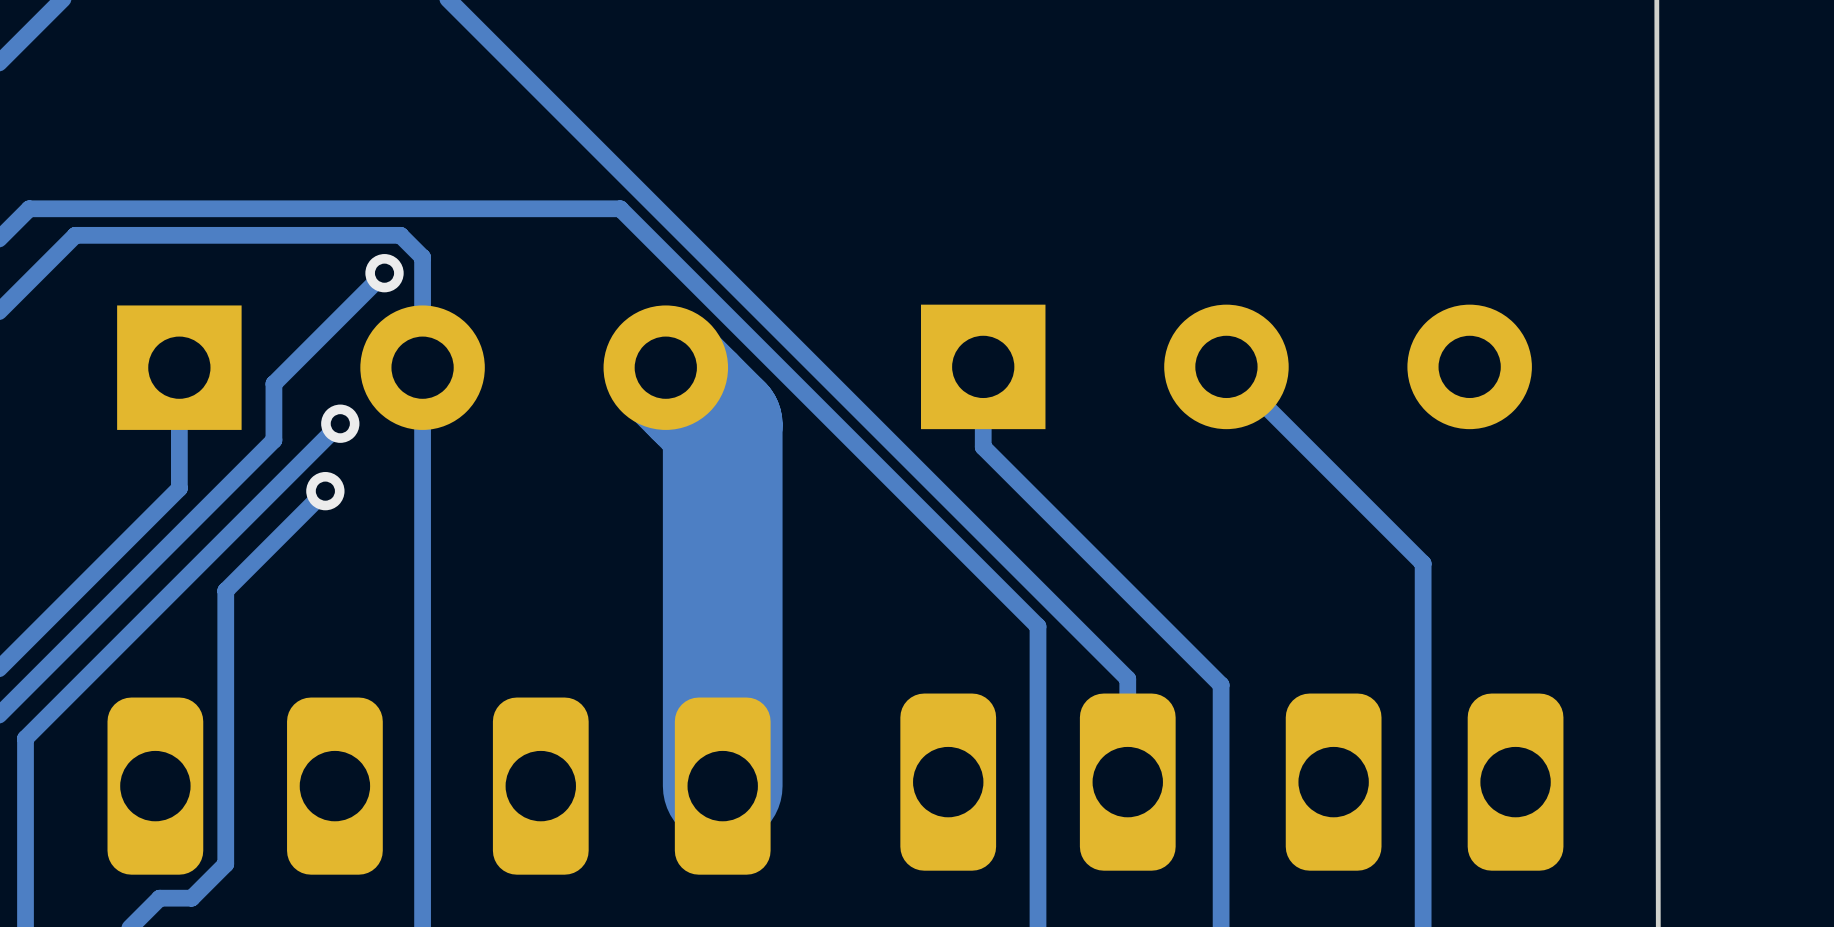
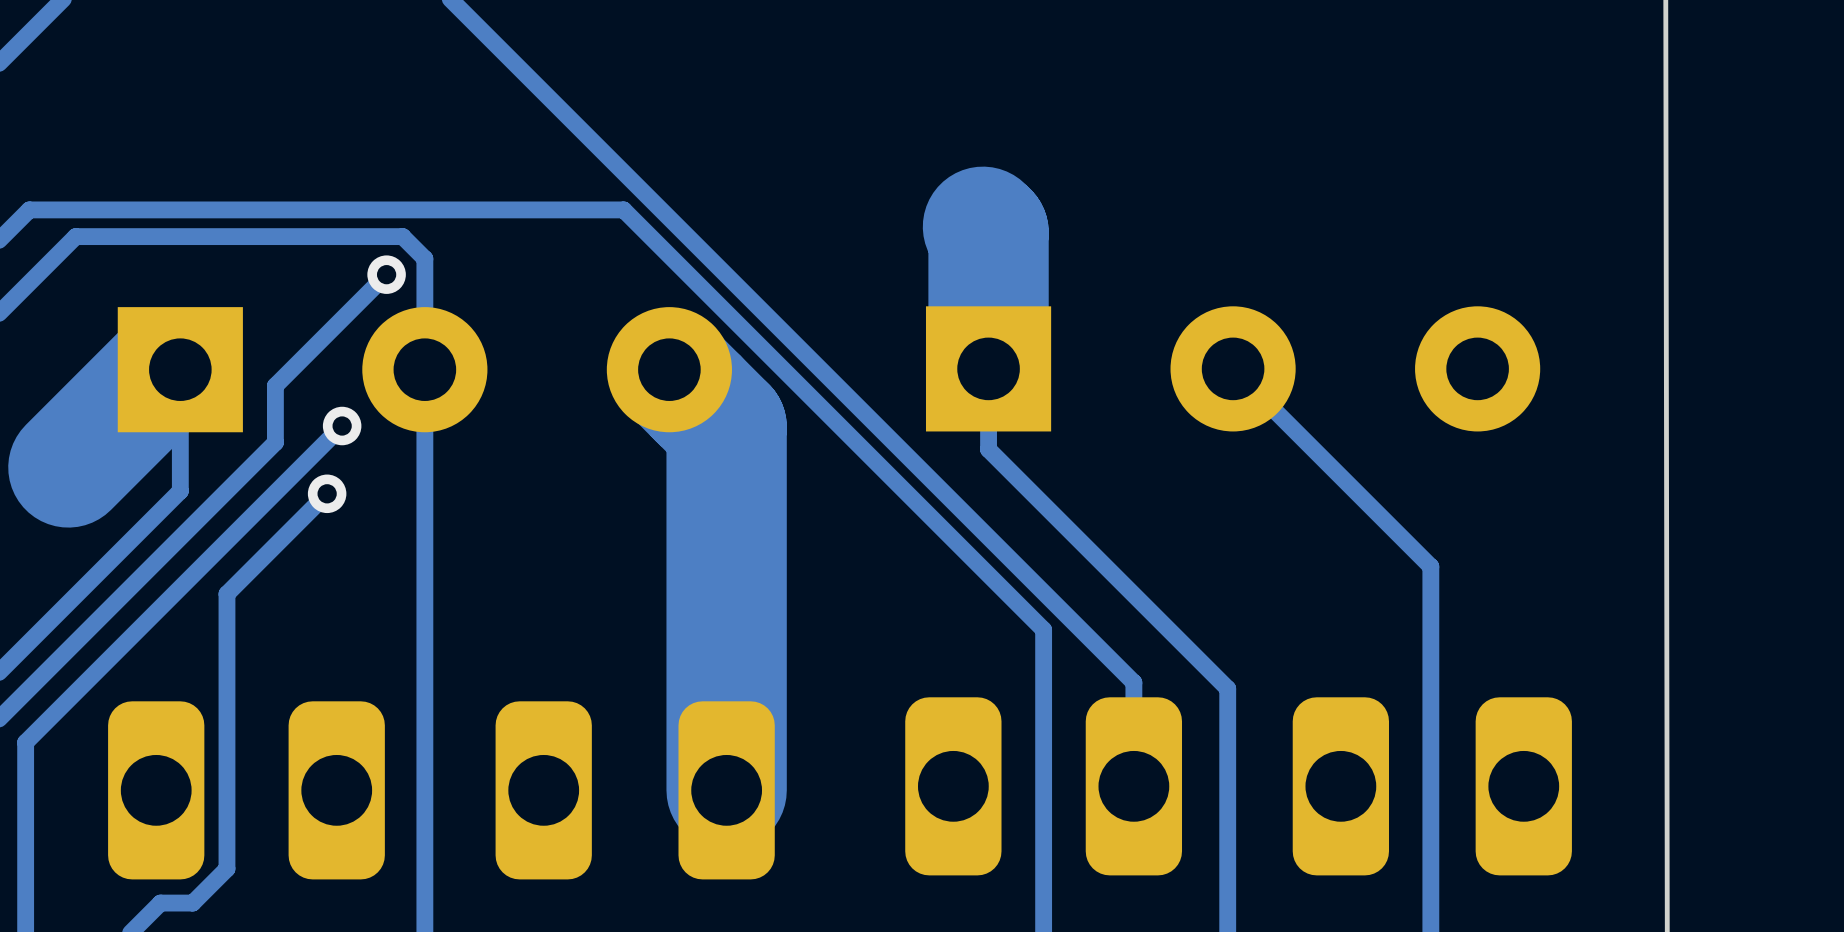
track: none -> (982, 226) (988, 232) (988, 368)
track: none -> (180, 369) (166, 369) (68, 467)

